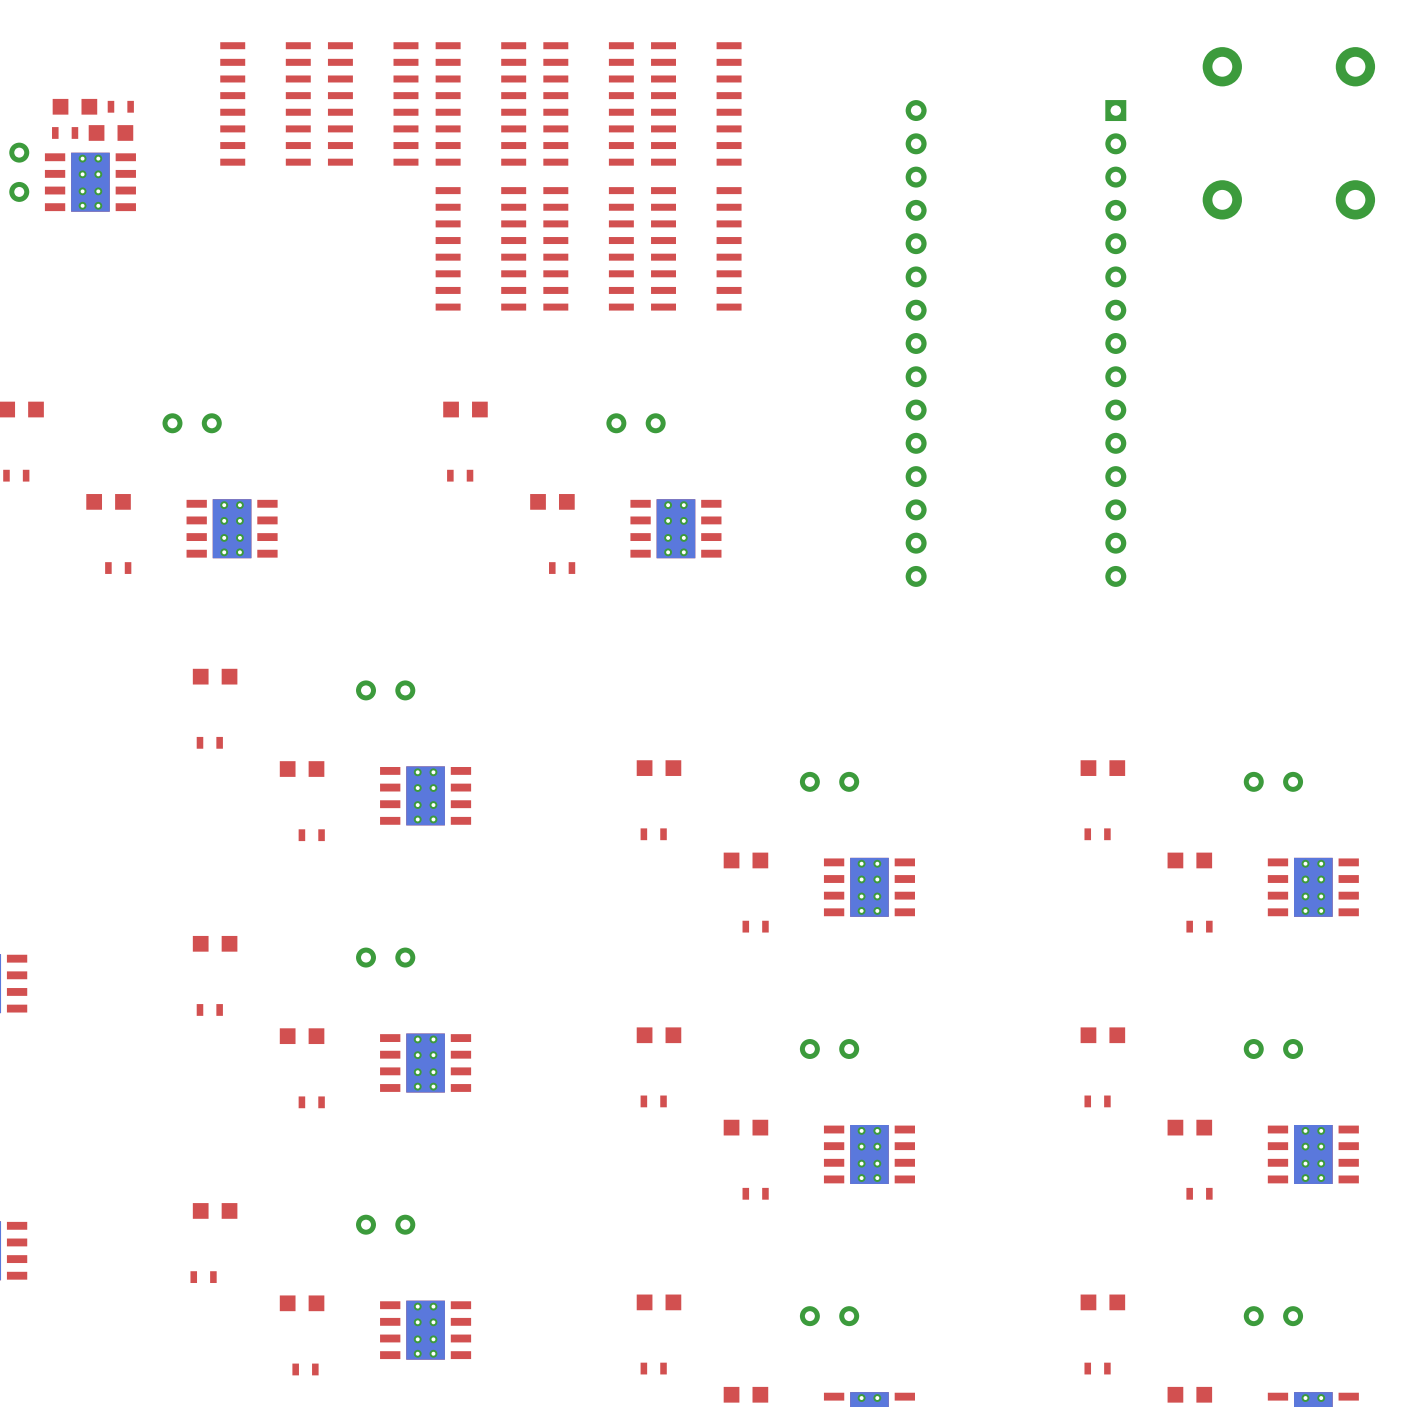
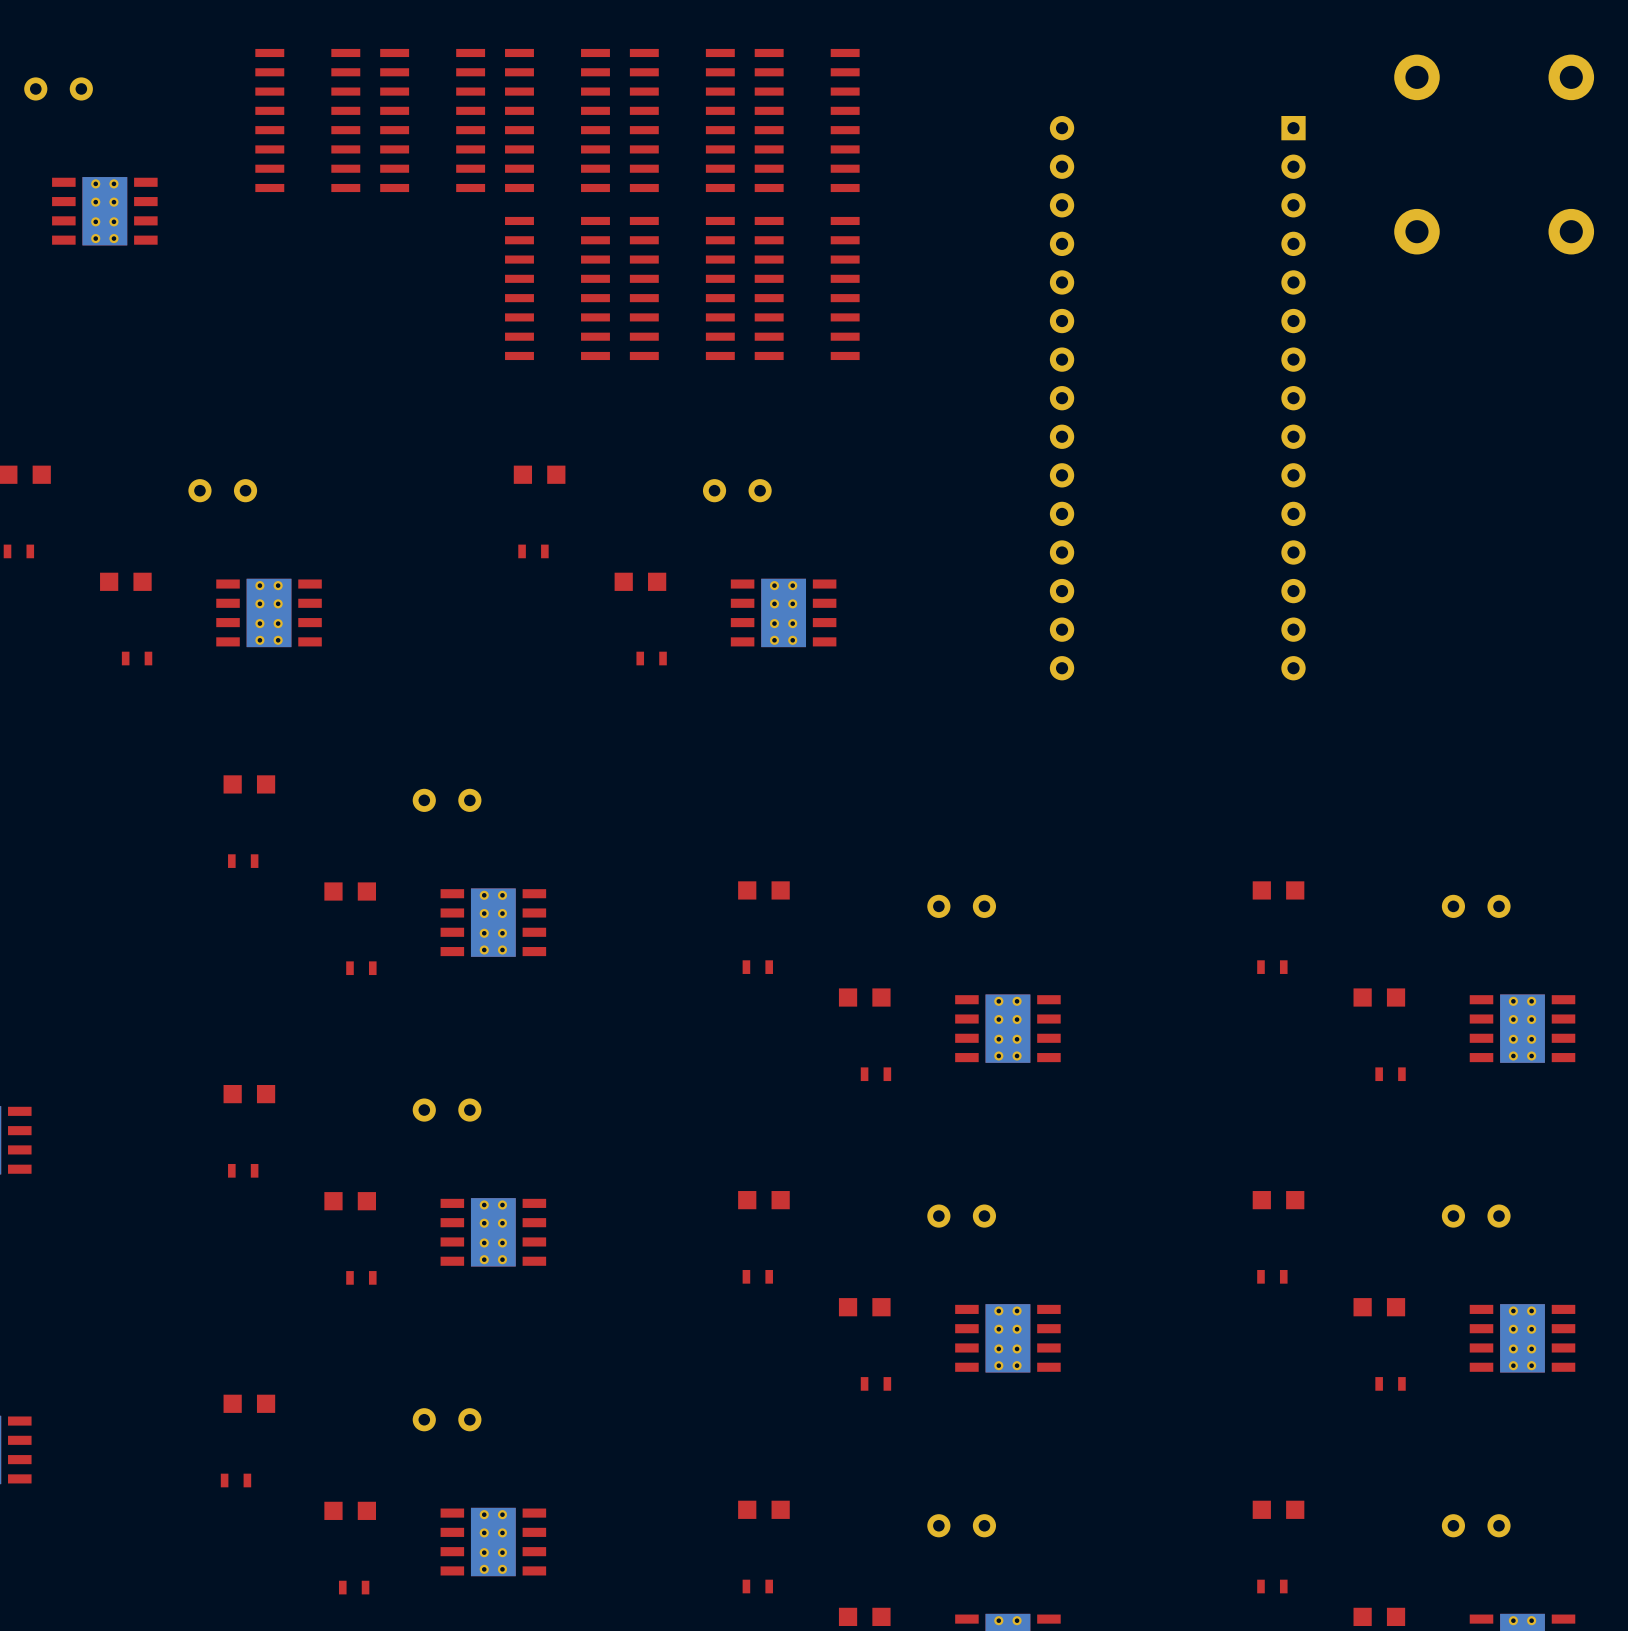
part: (74, 106) -> none
part: (120, 106) -> none
part: (65, 132) -> none
part: (110, 132) -> none
part rotation: 0° (19, 172) -> 90° clockwise (58, 88)
part position: (19, 172) -> (58, 88)

